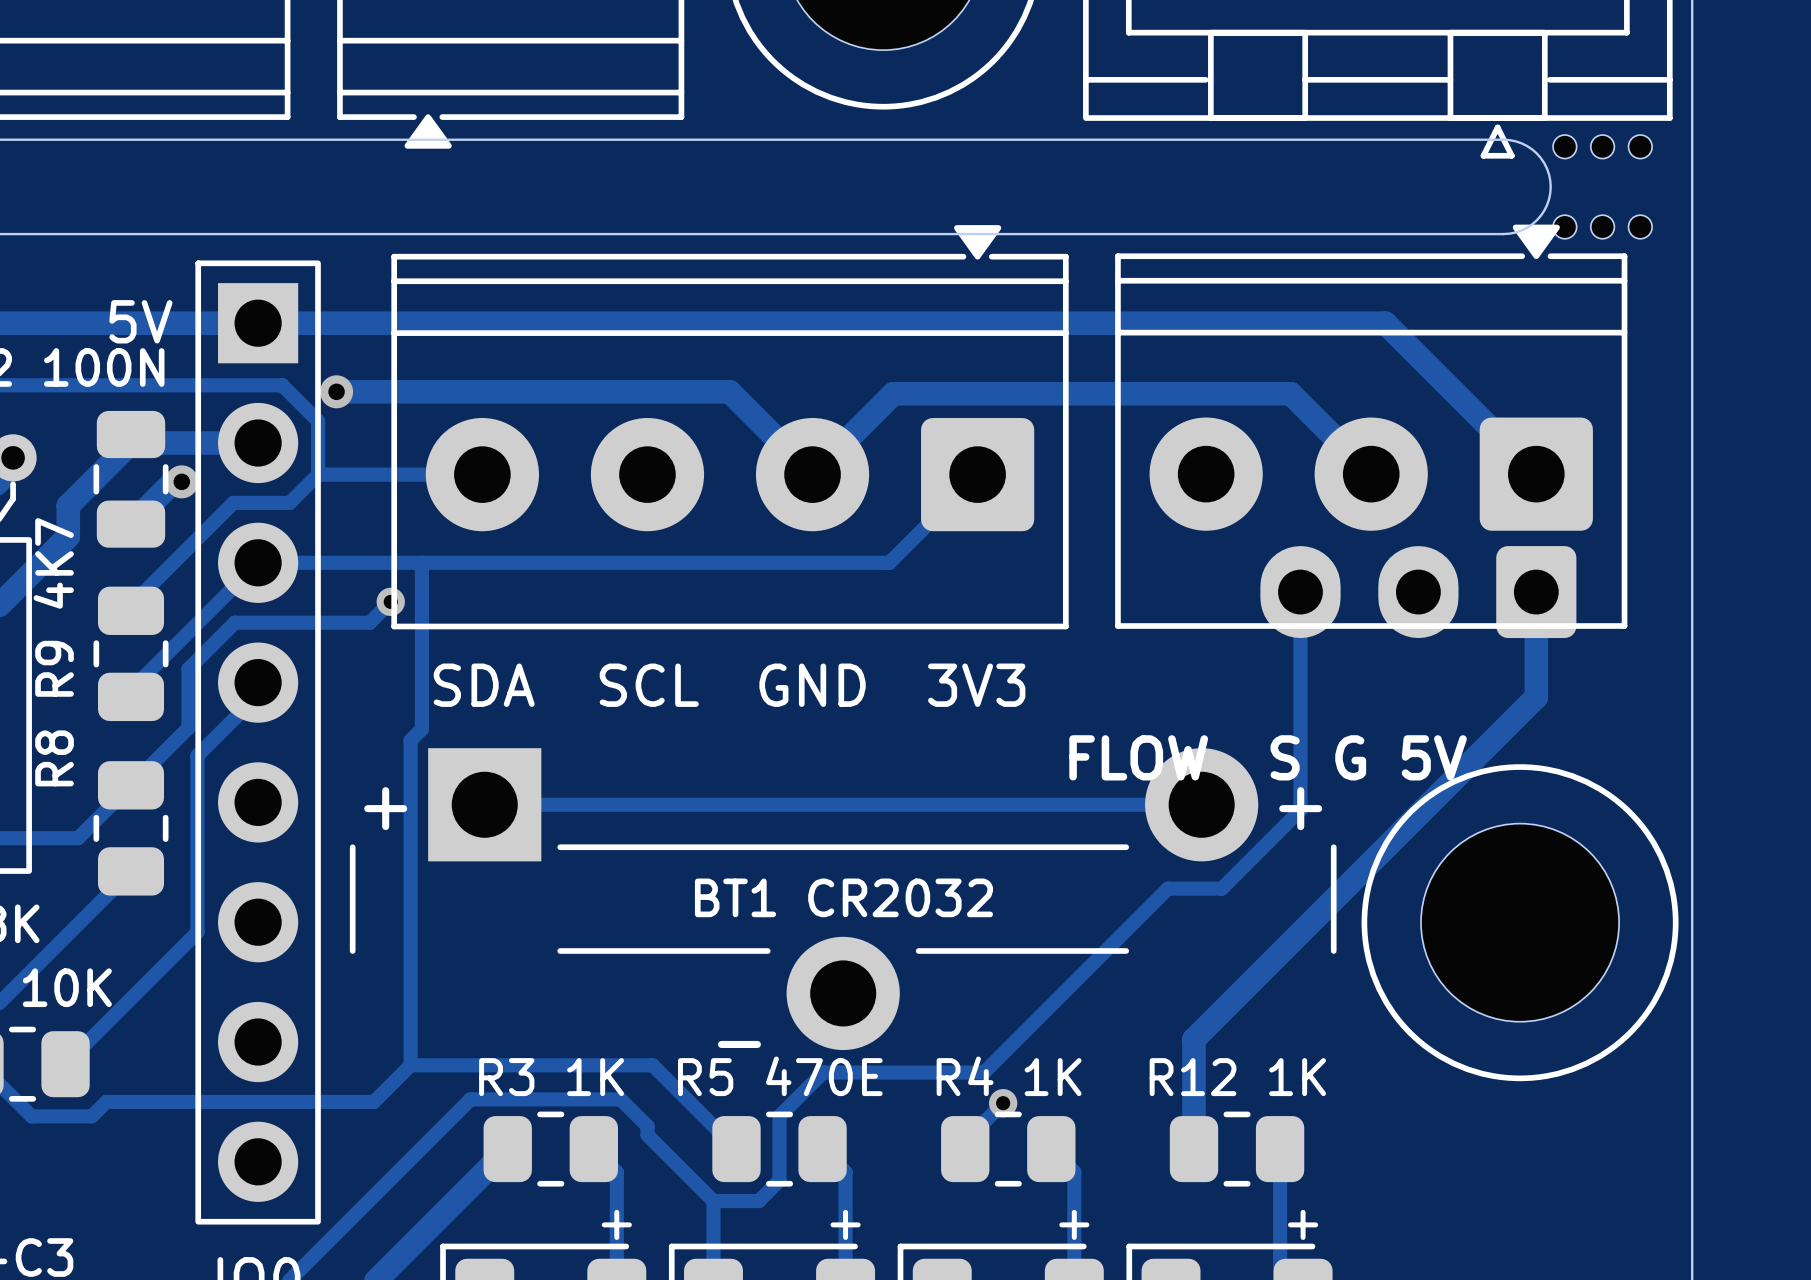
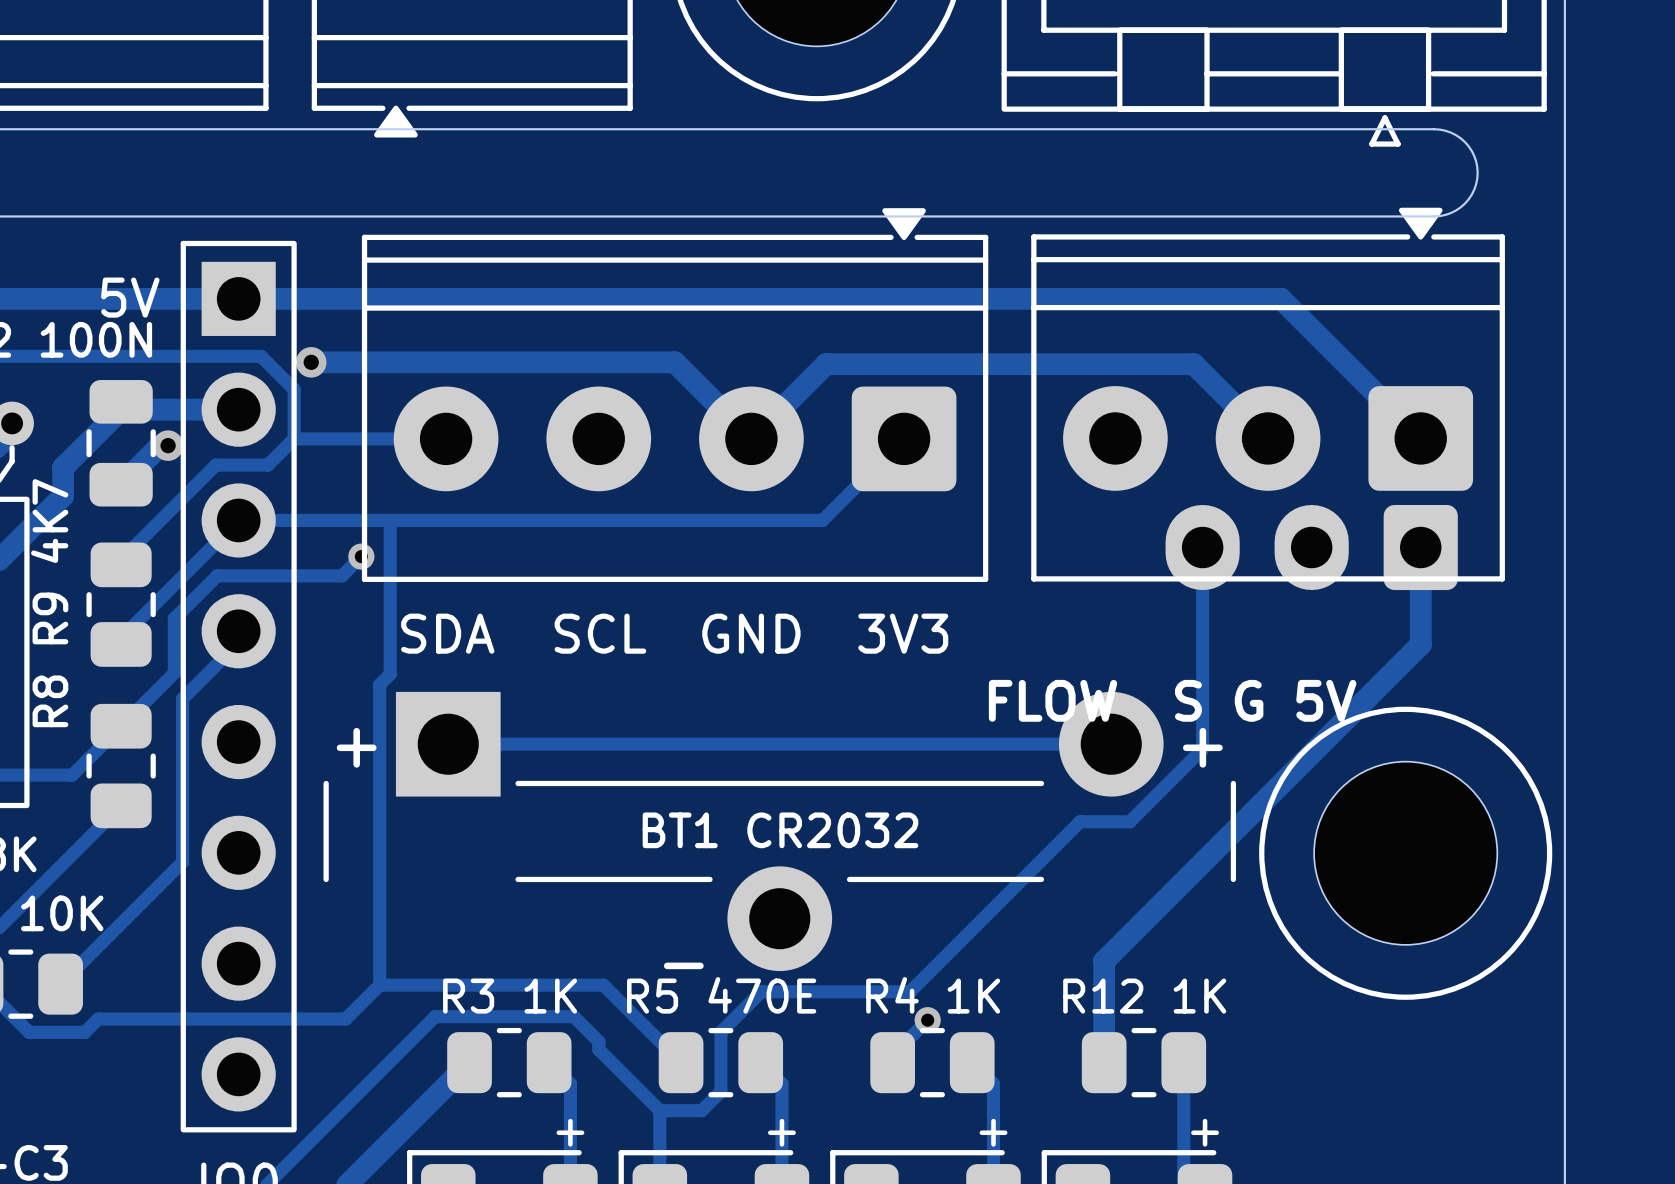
board edge: (1503, 139) (1521, 143) (1536, 153) (1547, 168) (1550, 186) (1547, 204) (1536, 220) (1521, 230) (1503, 234) -> (1390, 129) (1439, 129) (1455, 135) (1471, 151) (1477, 172) (1471, 194) (1455, 210) (1439, 216) (1390, 216)
part: (1564, 146) -> none
part: (1602, 146) -> none
part: (1640, 146) -> none
part: (1564, 226) -> none
part: (1602, 226) -> none
part: (1640, 226) -> none

